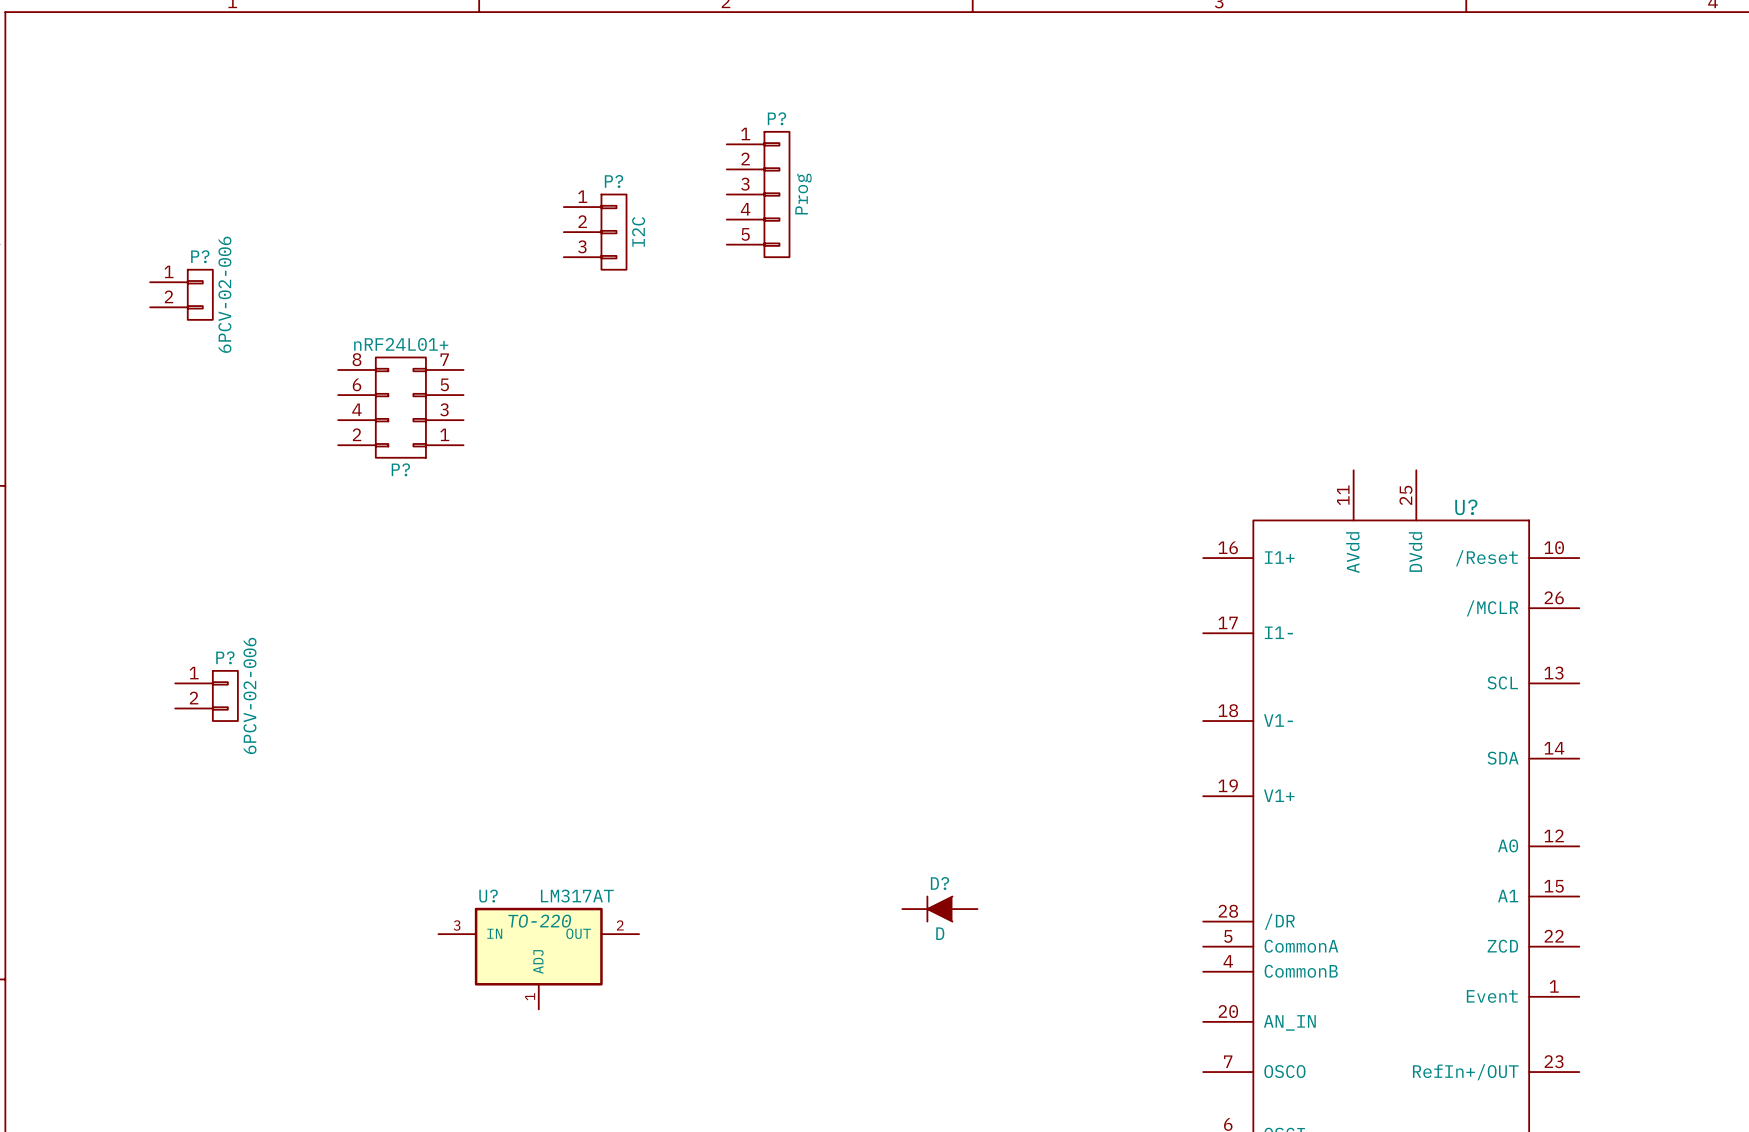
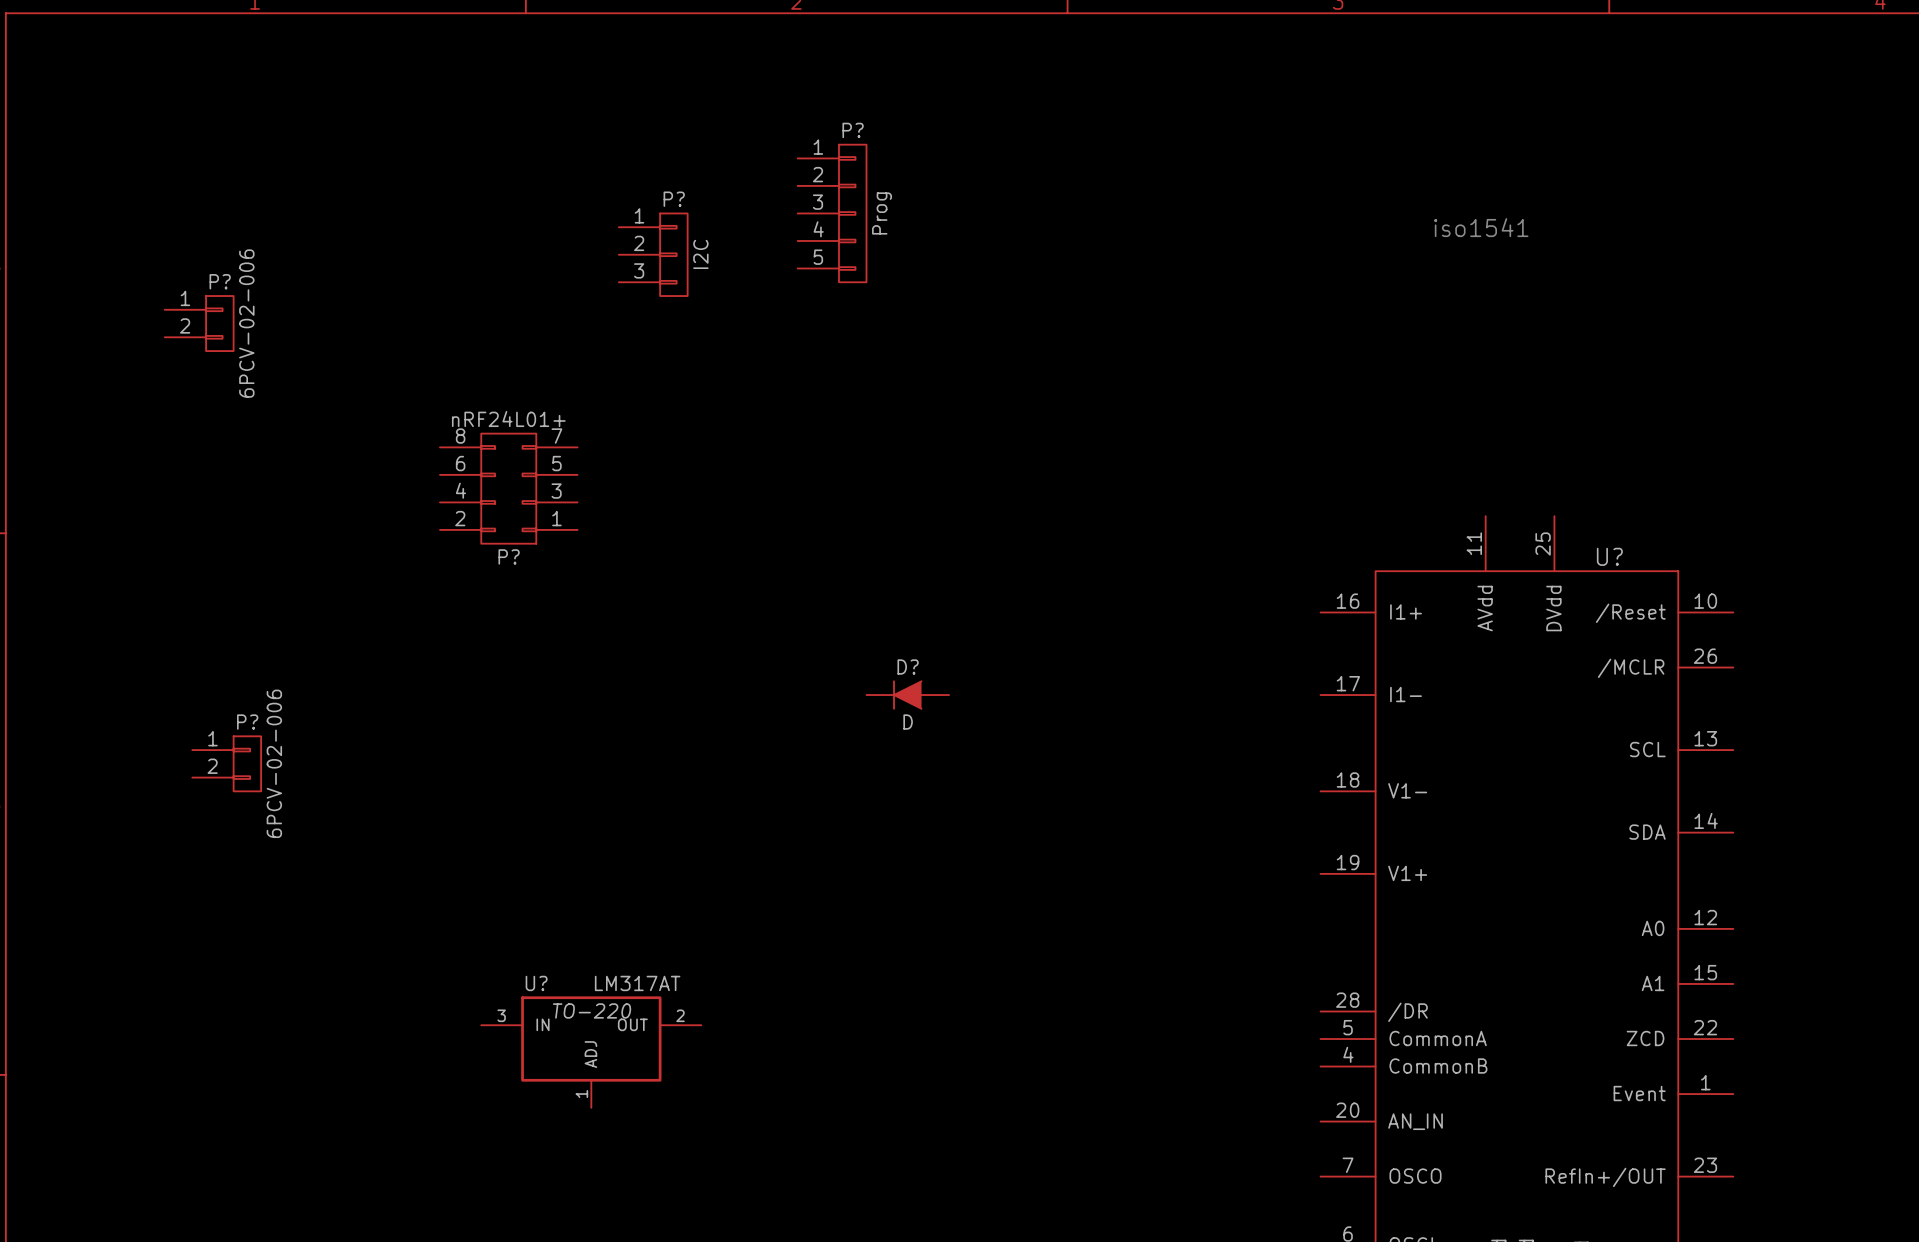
text: none -> iso1541 (1481, 227)
P? position: (400, 407) -> (508, 488)
D?: none -> D (907, 695)
D?: D (939, 909) -> none

